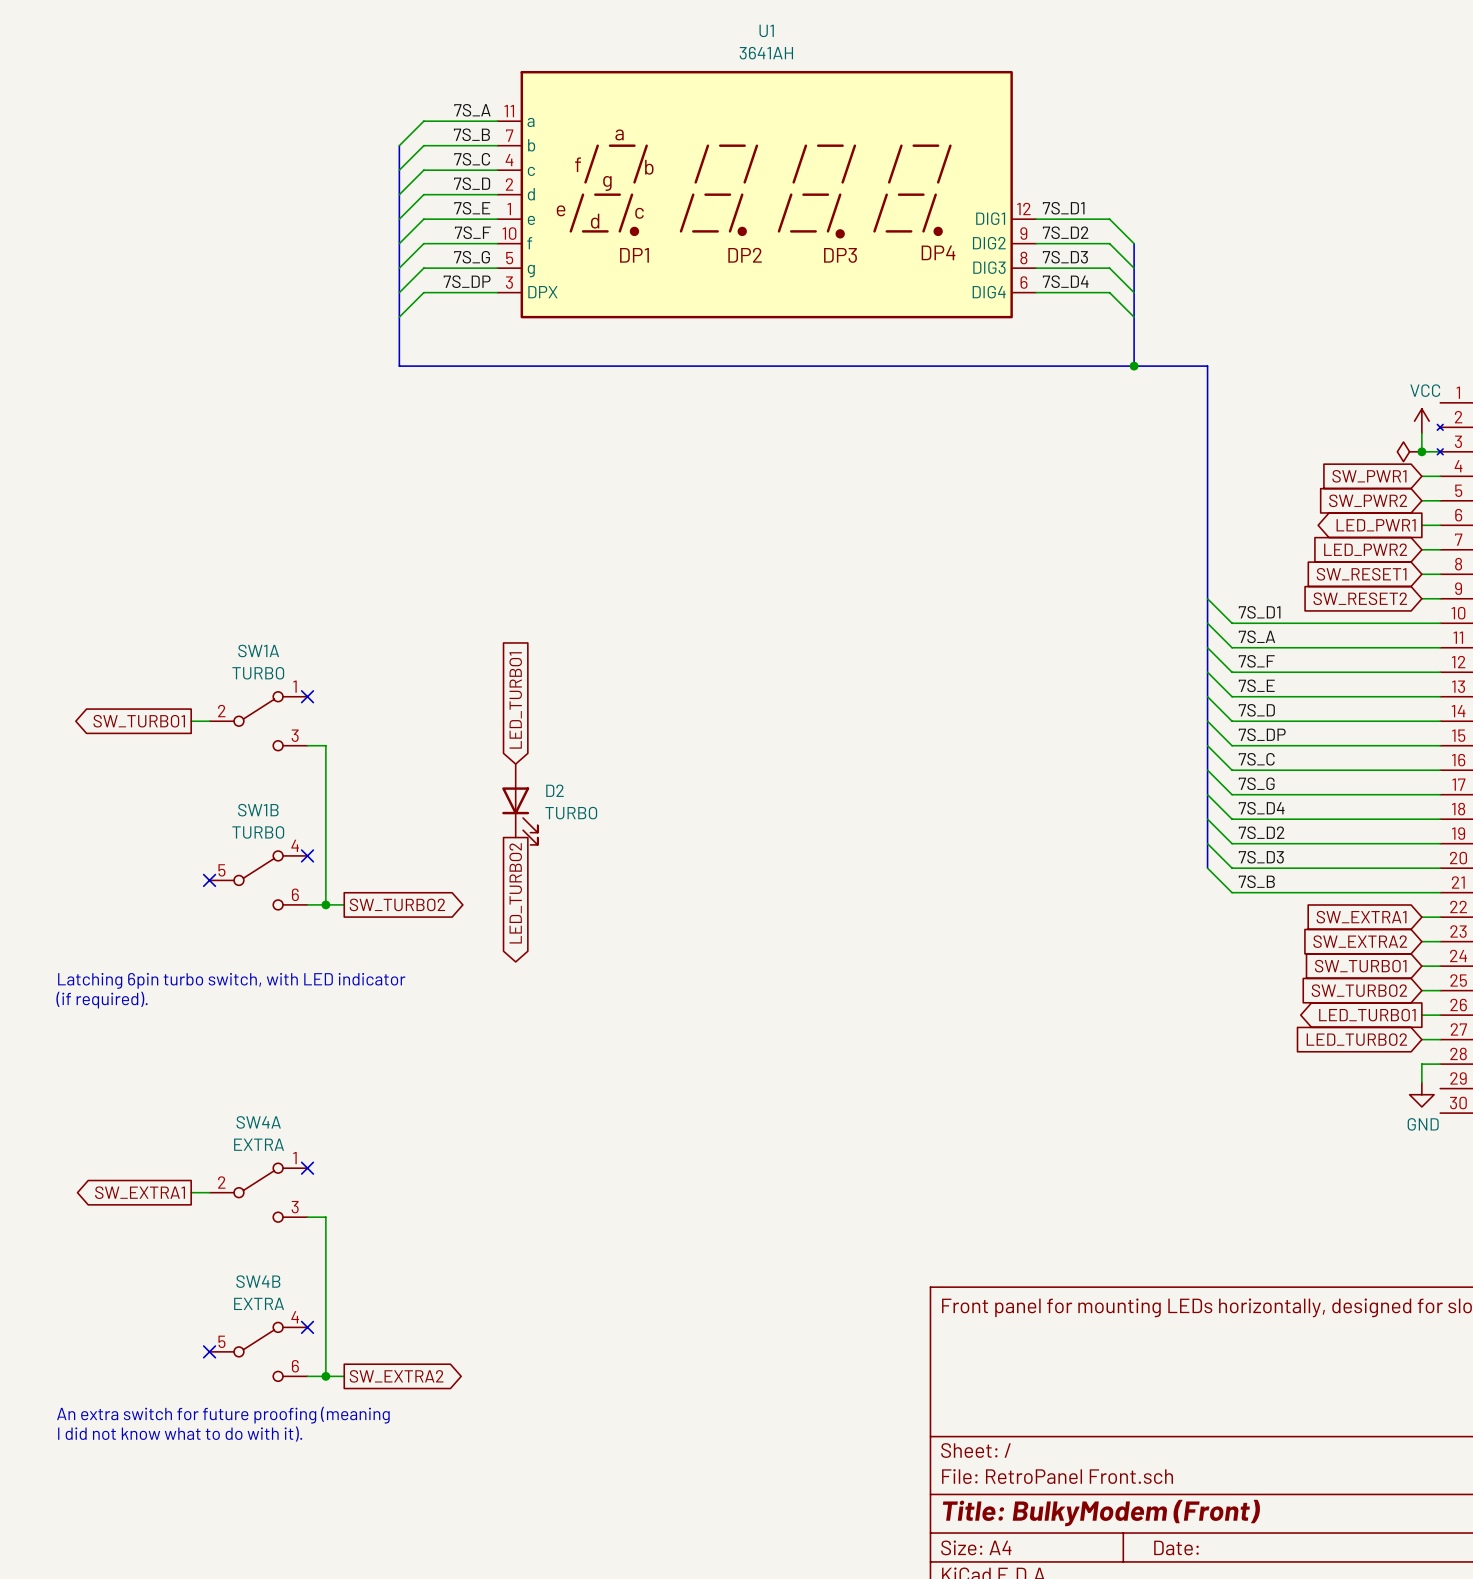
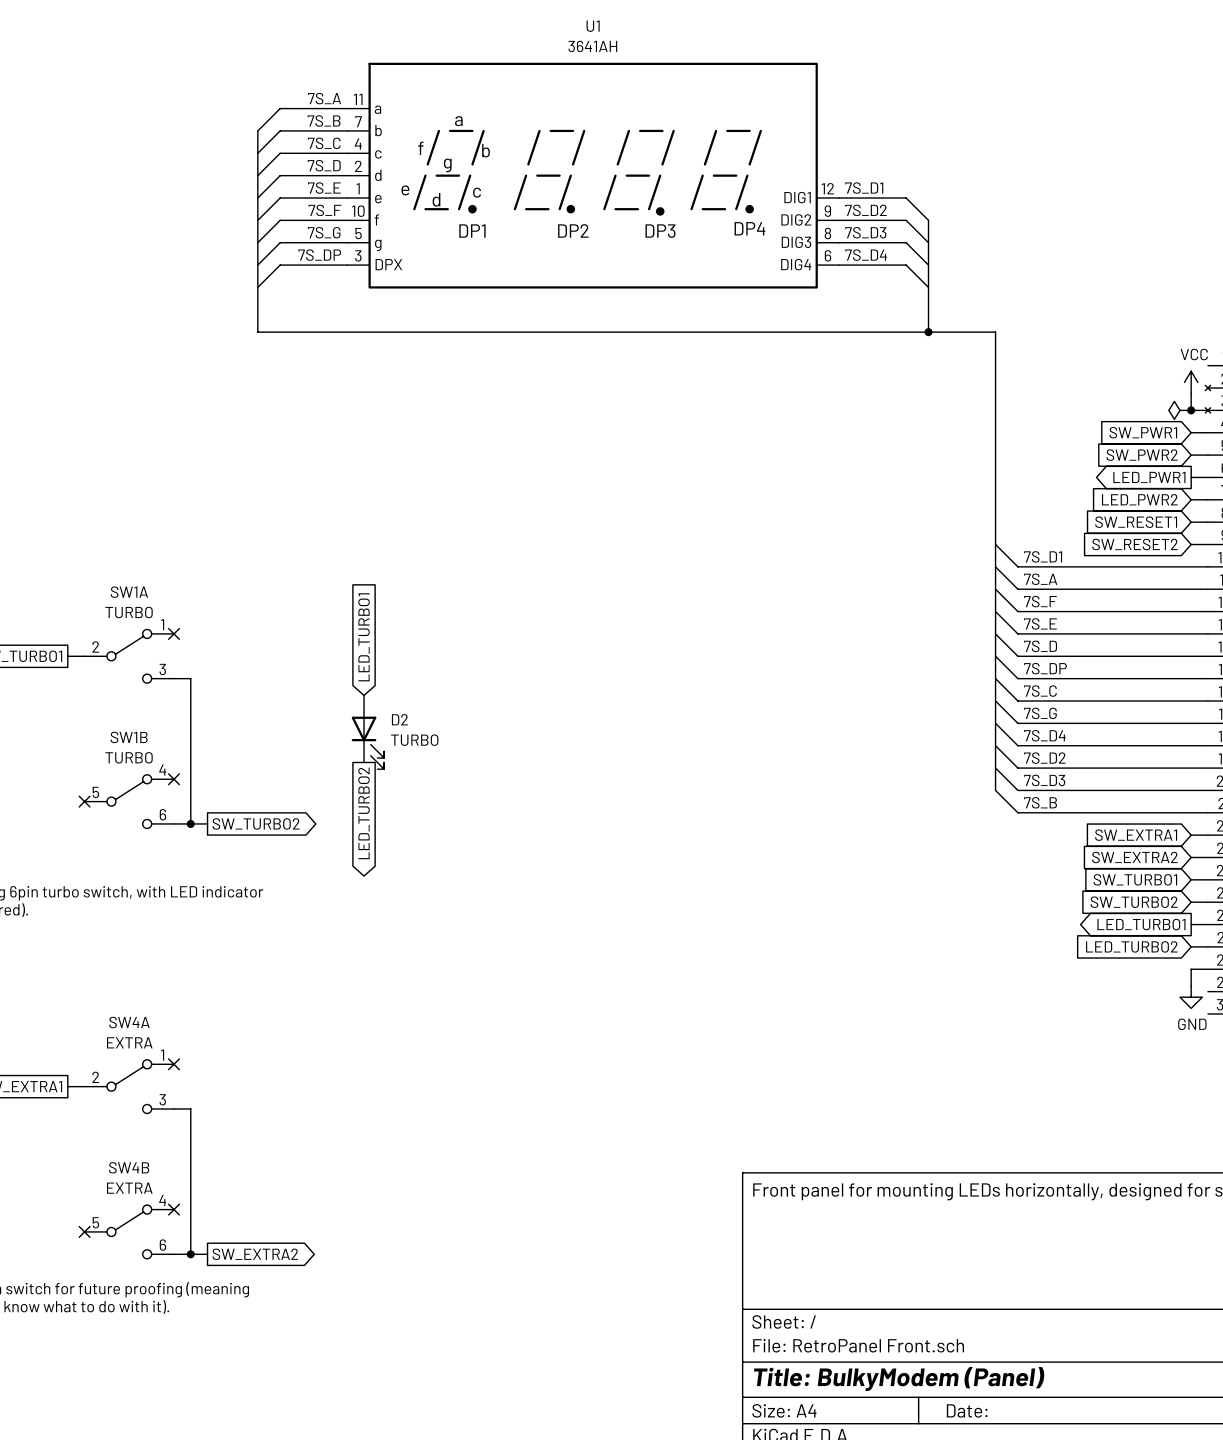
title block: Title: BulkyModem (Front) (1101, 1513) -> Title: BulkyModem (Panel) (899, 1379)

